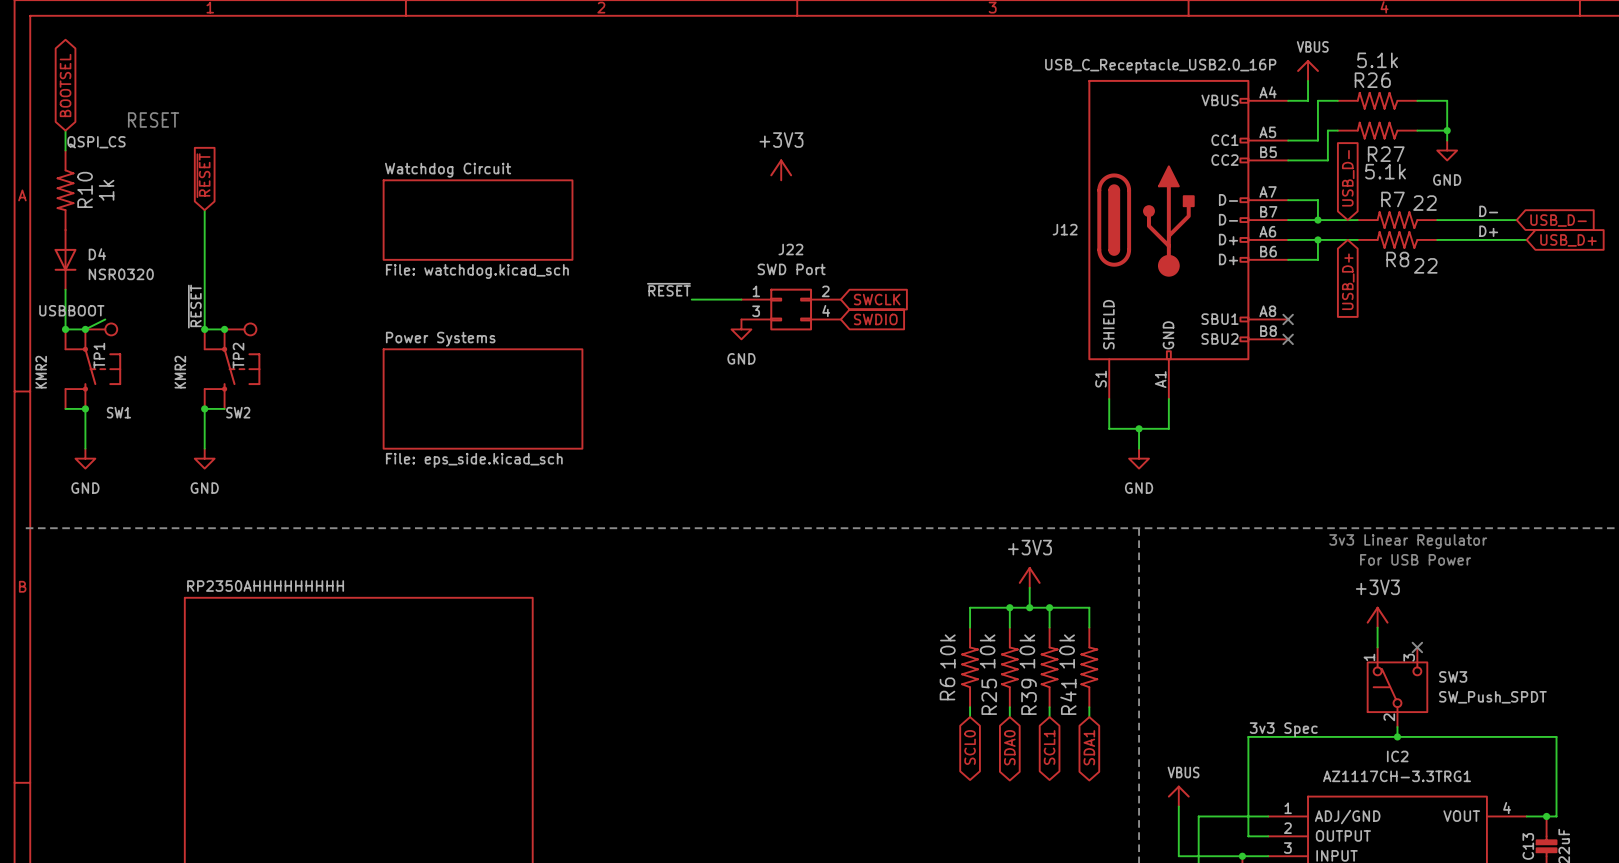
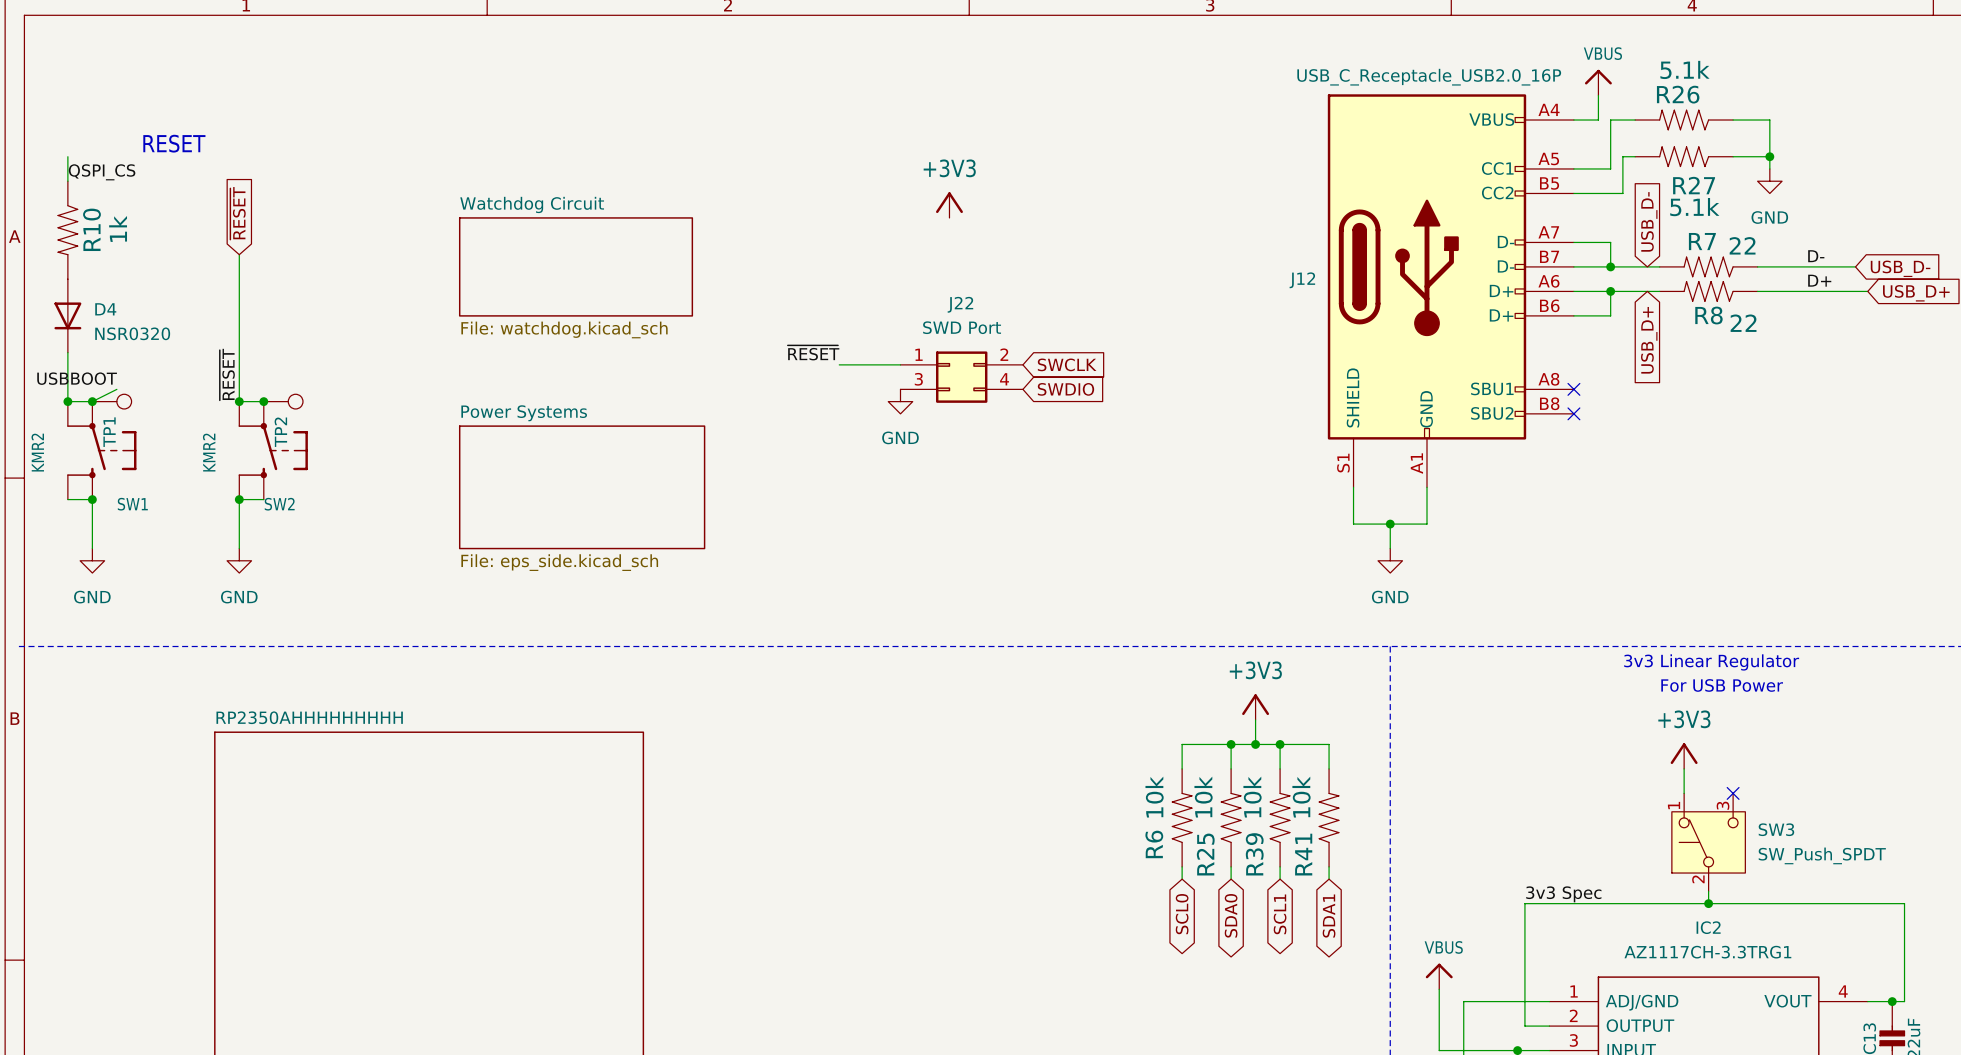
global label: BOOTSEL (65, 85) -> none

